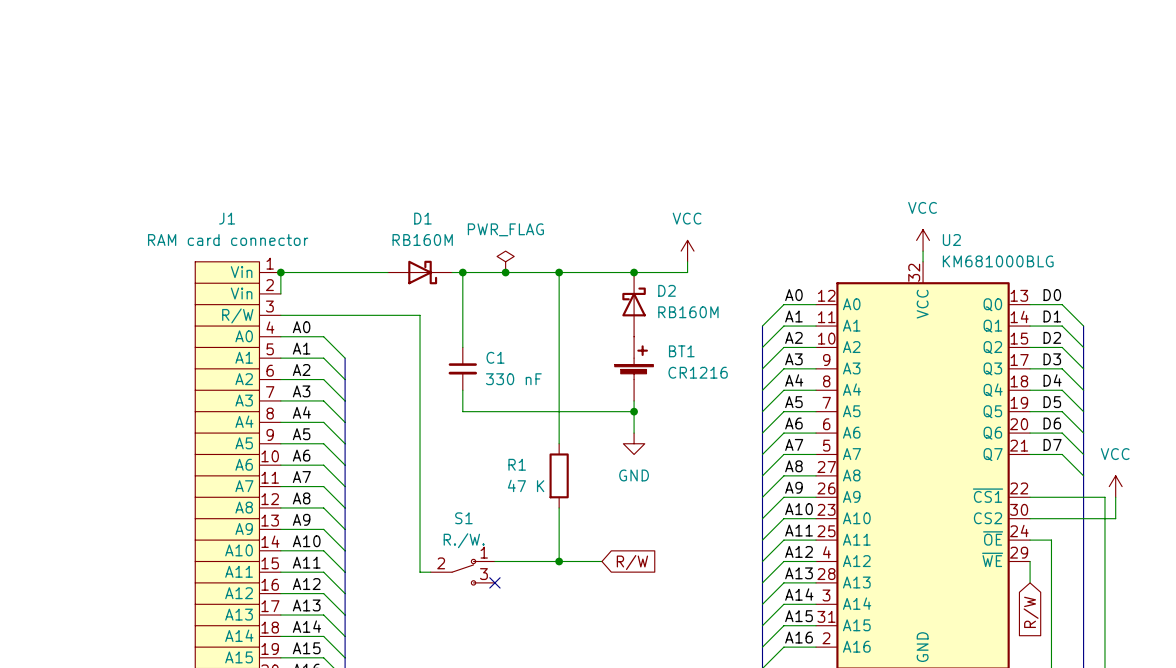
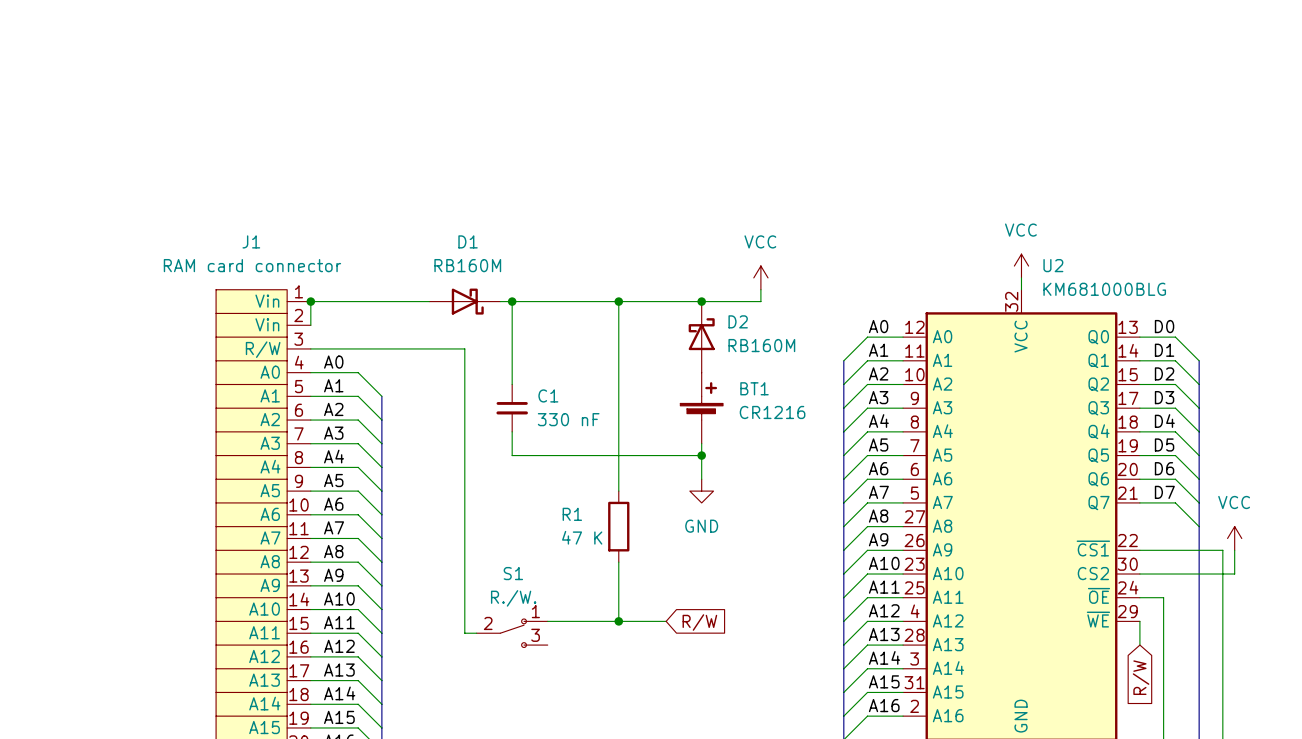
power symbol: PWR_FLAG (505, 261) -> none
junction: (505, 272) -> none
no-connect mark: (494, 582) -> none

